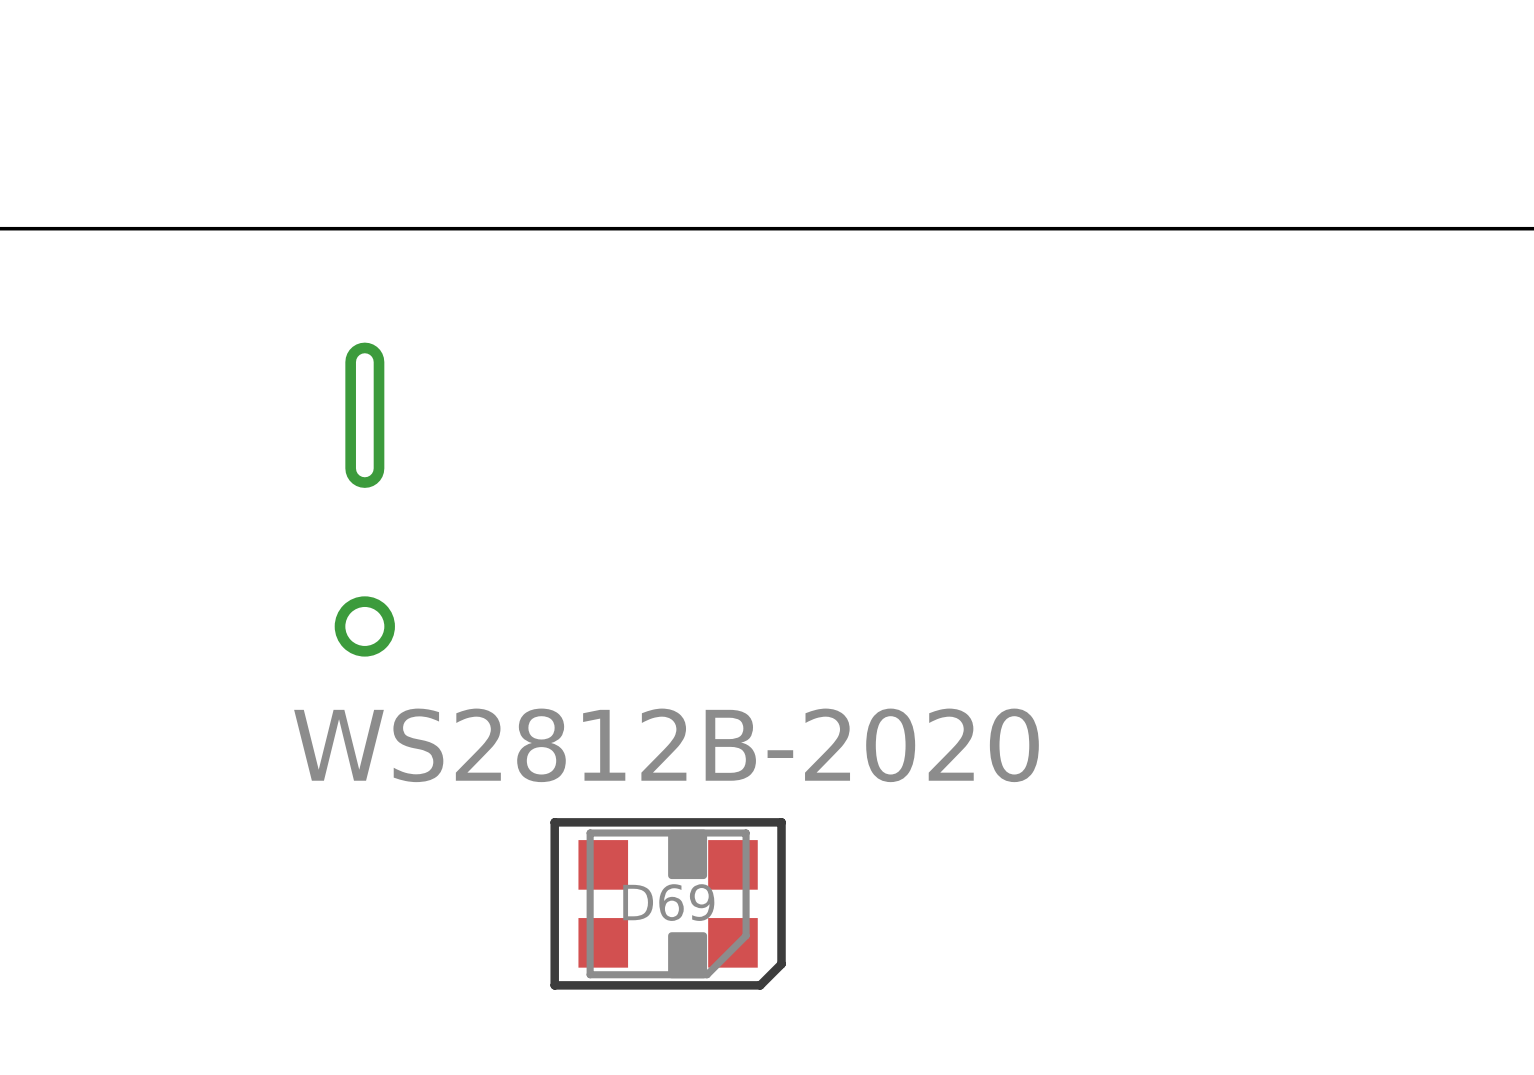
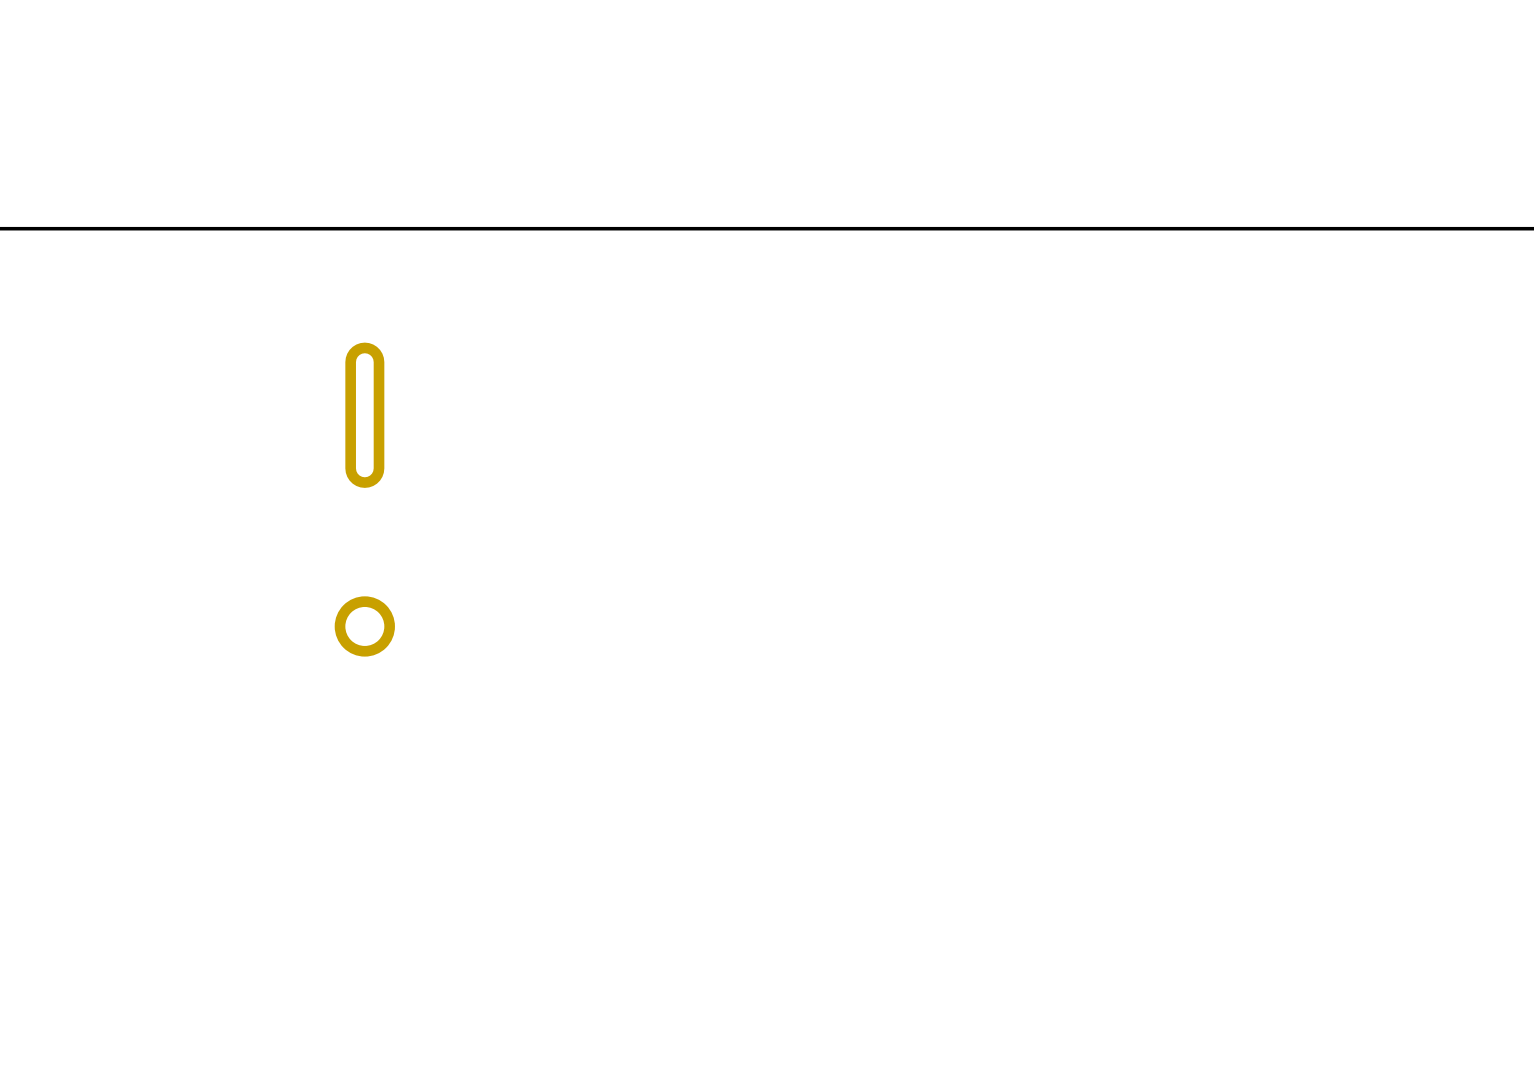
D69: WS2812B-2020 (668, 903) -> none

